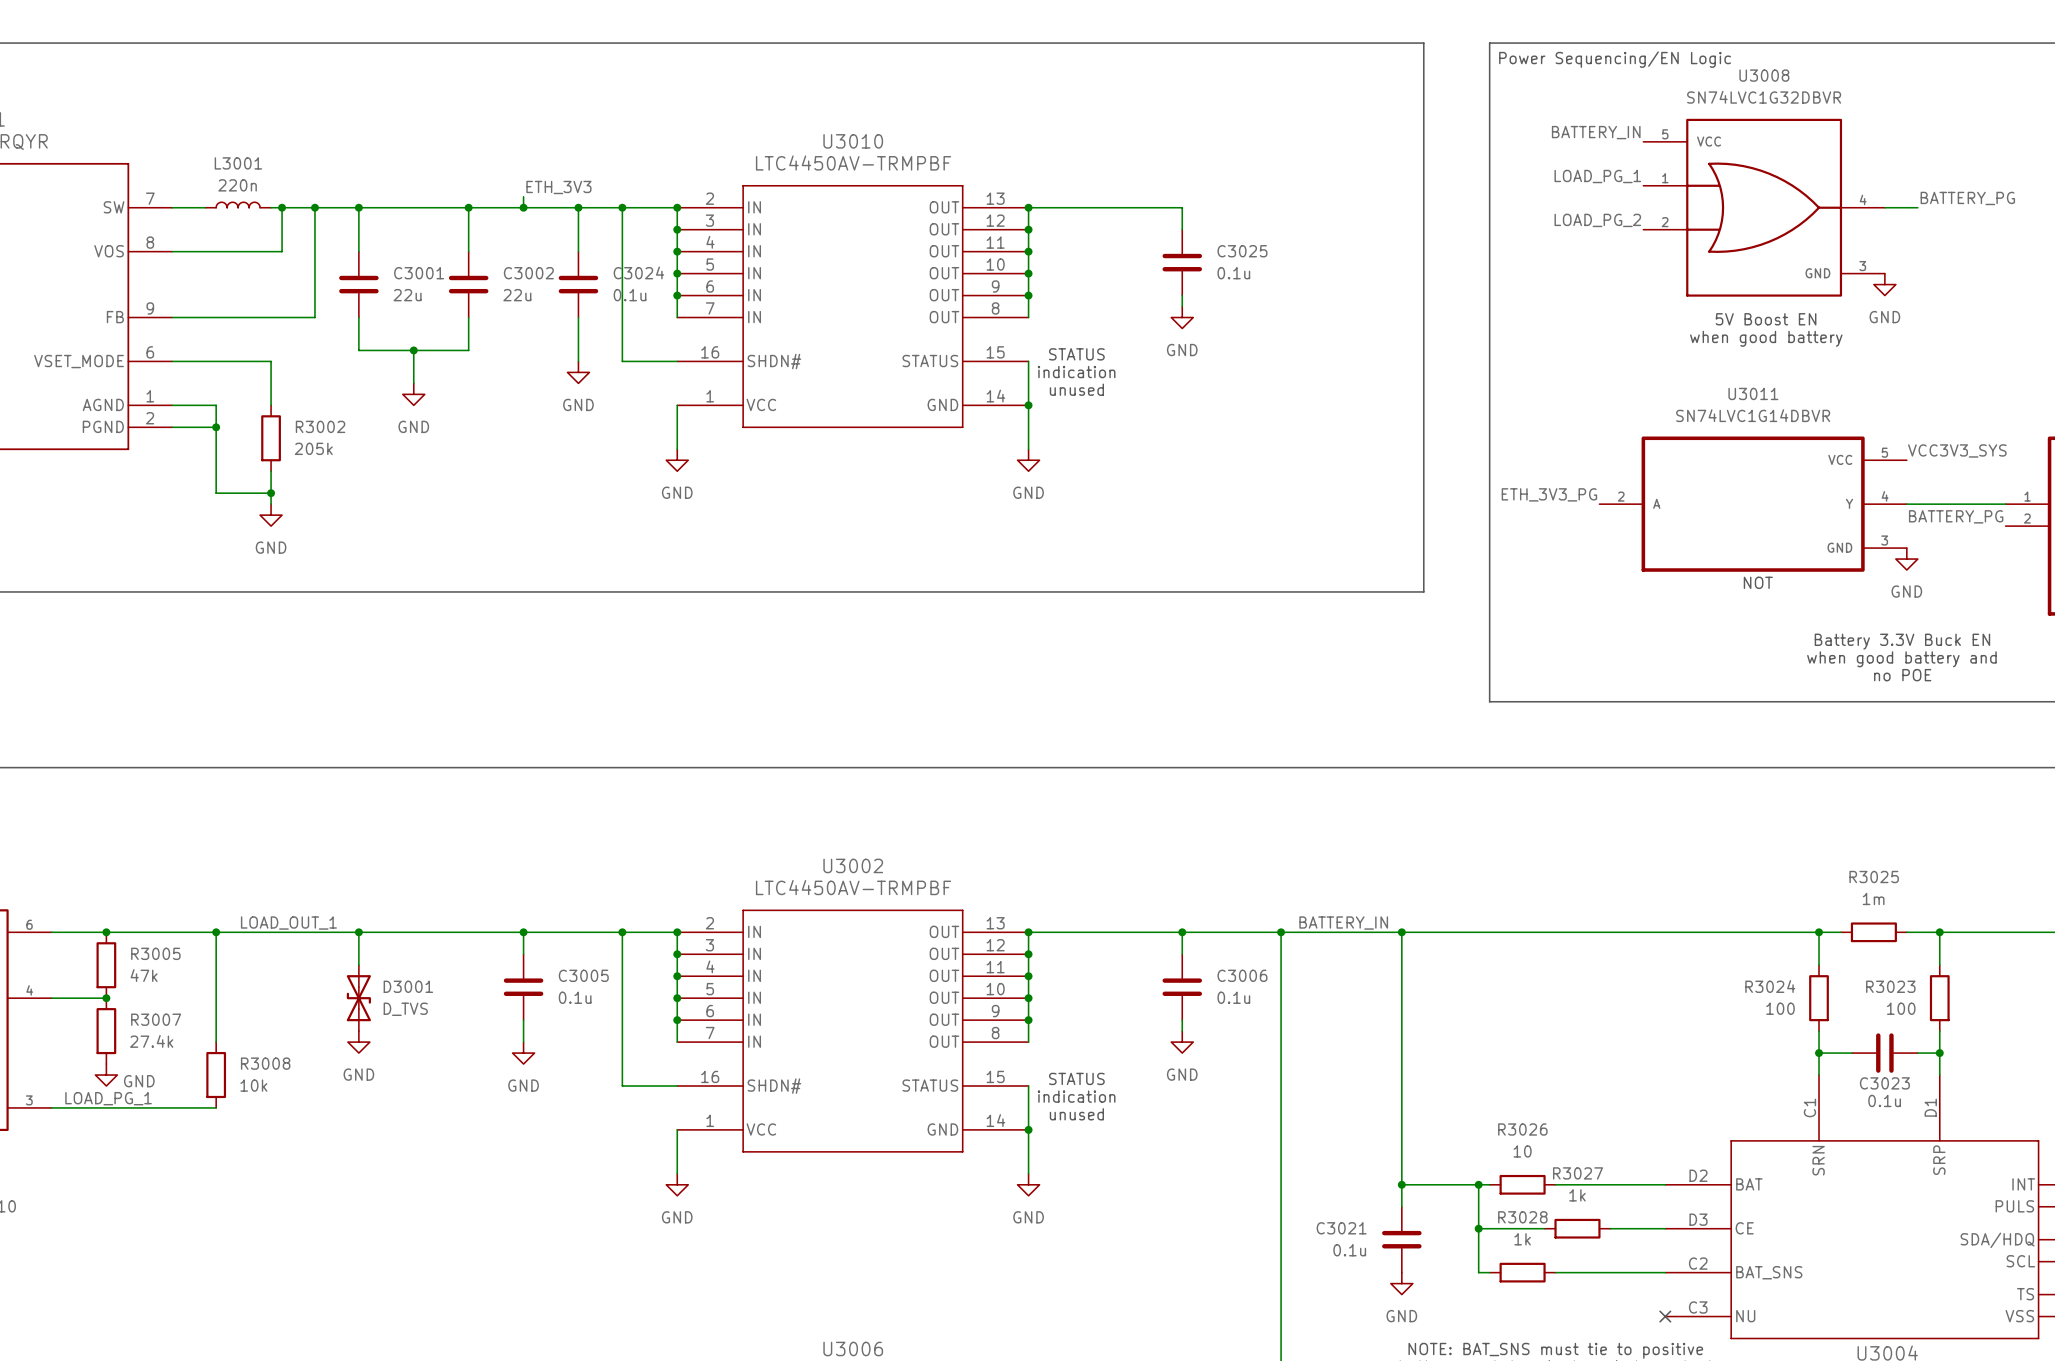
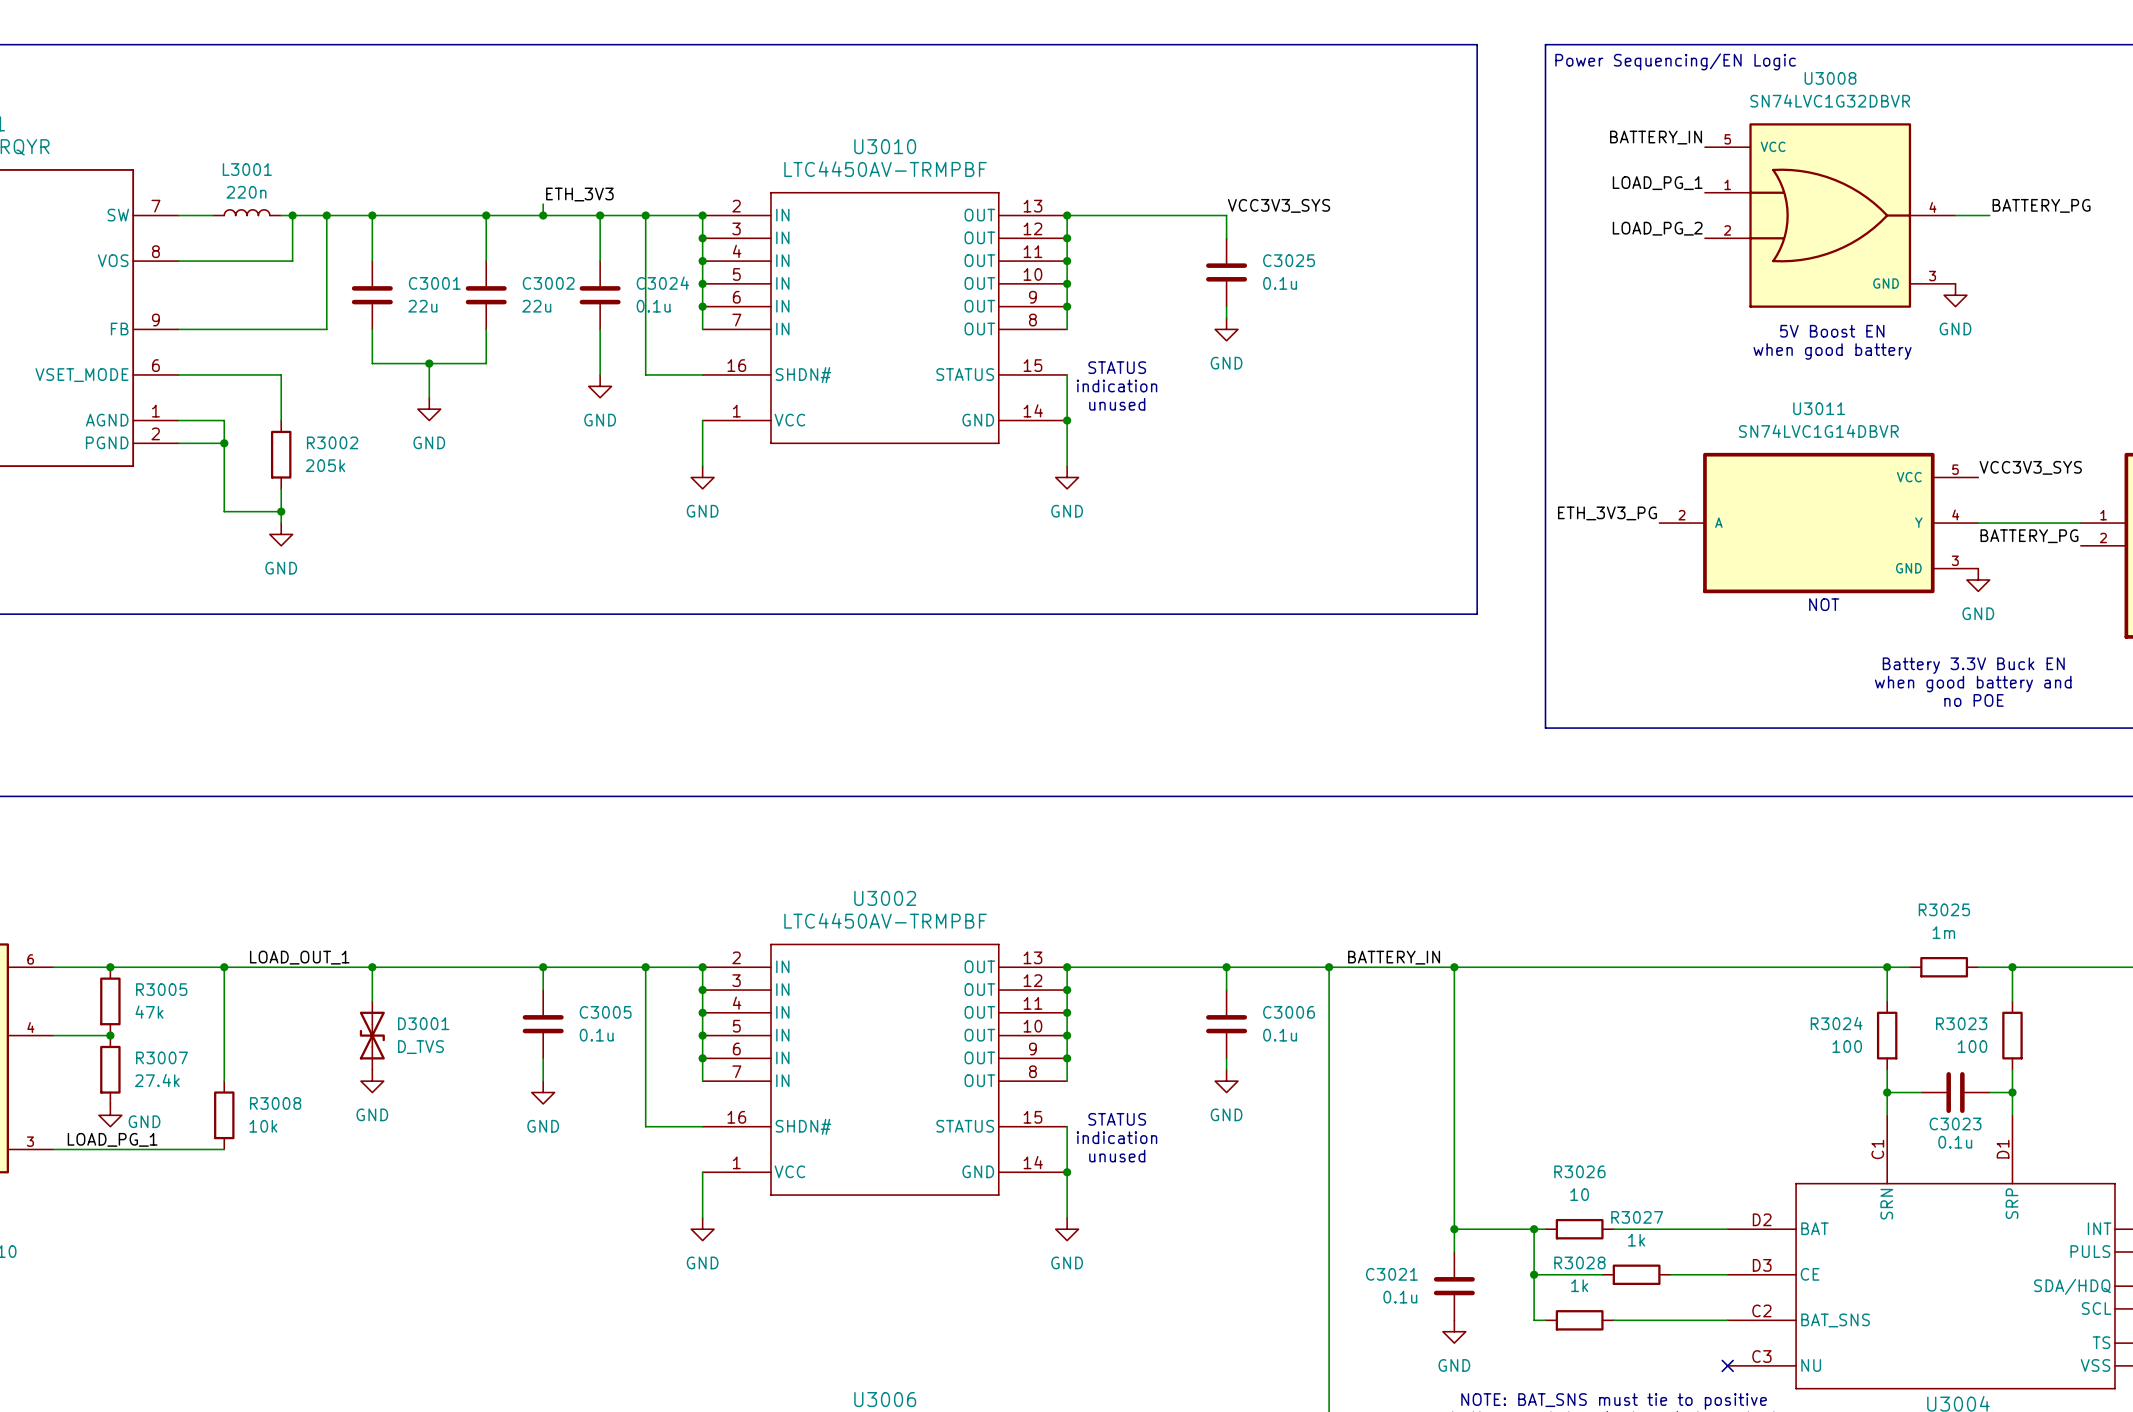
label: none -> VCC3V3_SYS (1279, 205)

